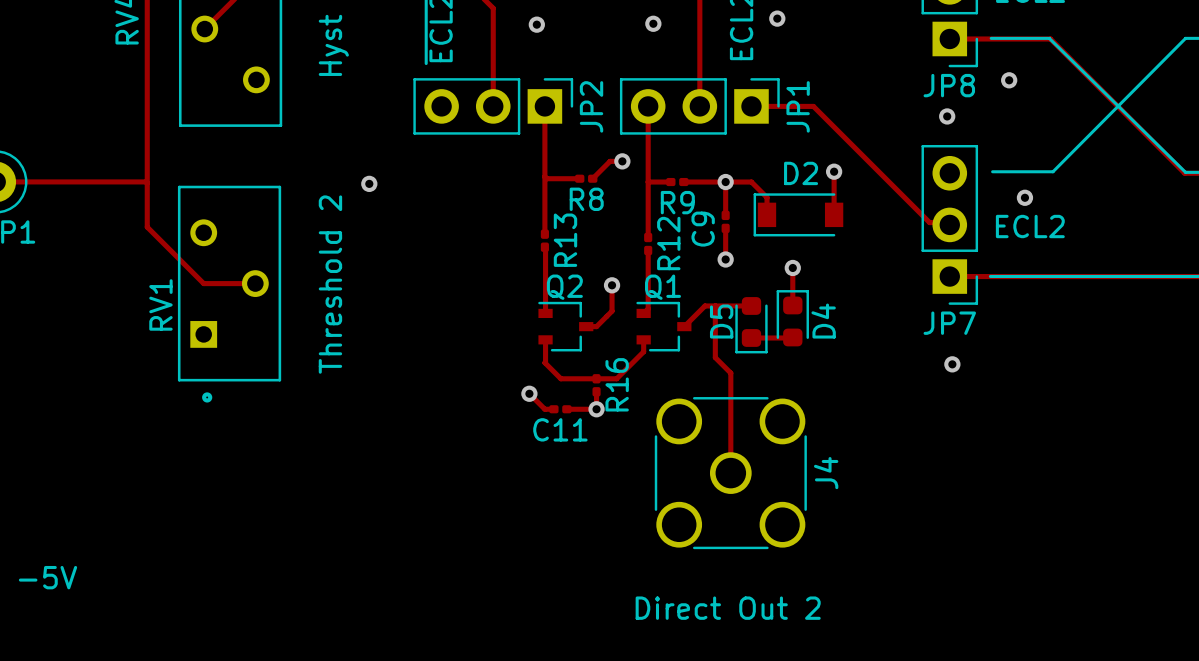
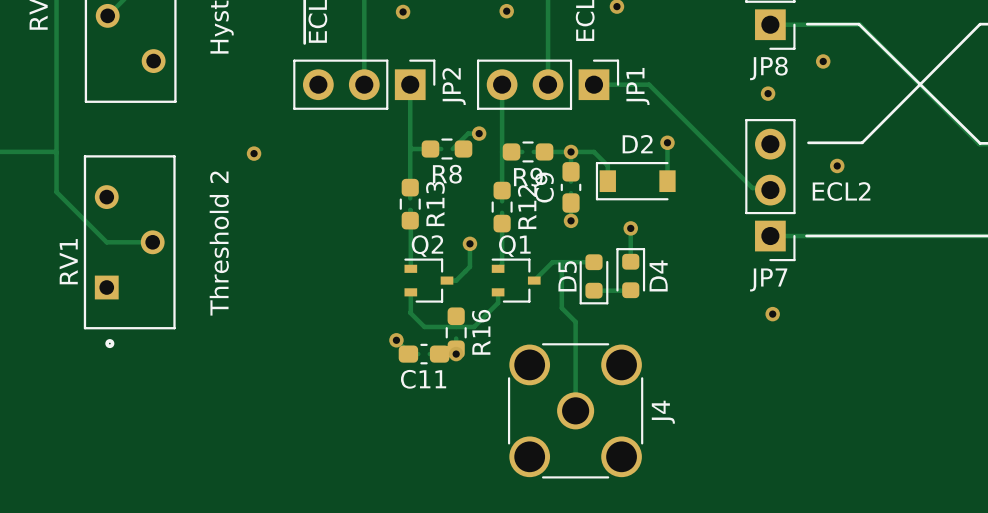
R8 footprint: [575, 174, 598, 183] -> [421, 138, 473, 160]
R9 footprint: [666, 177, 689, 187] -> [502, 141, 554, 163]
C9 footprint: [721, 210, 730, 234] -> [560, 162, 582, 213]
R13 footprint: [540, 229, 549, 252] -> [399, 178, 421, 230]
R12 footprint: [644, 232, 653, 256] -> [491, 181, 513, 233]
R16 footprint: [592, 374, 601, 397] -> [445, 307, 467, 359]
C11 footprint: [549, 405, 572, 414] -> [398, 343, 450, 365]

